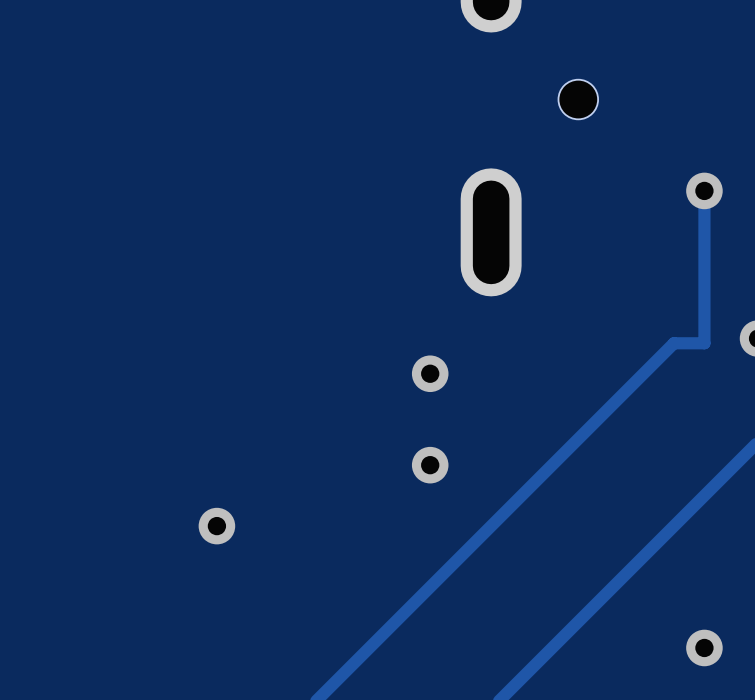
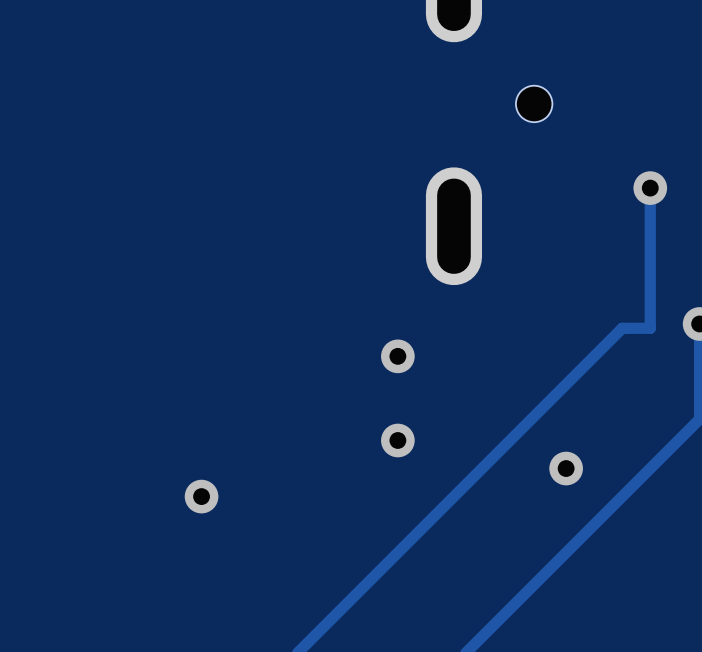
via: none -> (566, 468)
via: (704, 647) -> none

